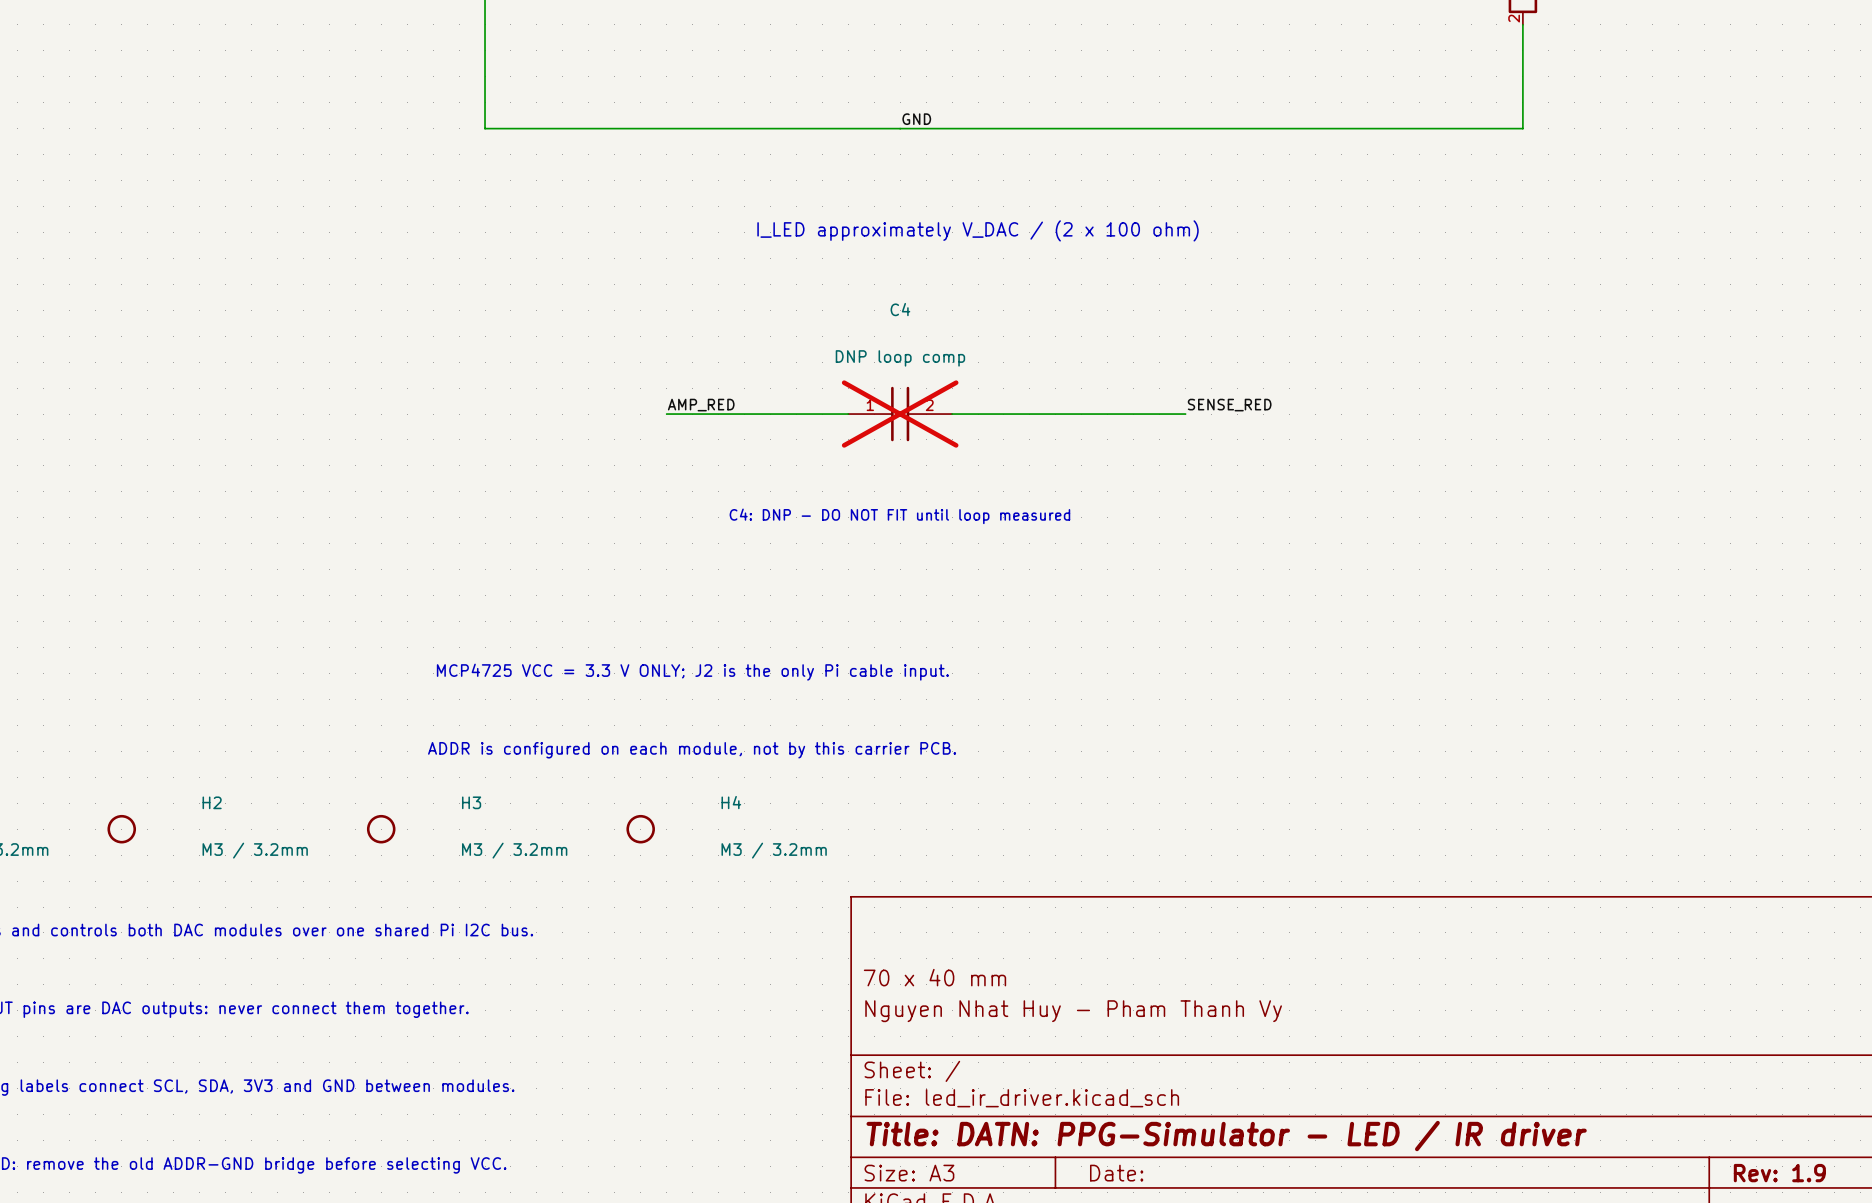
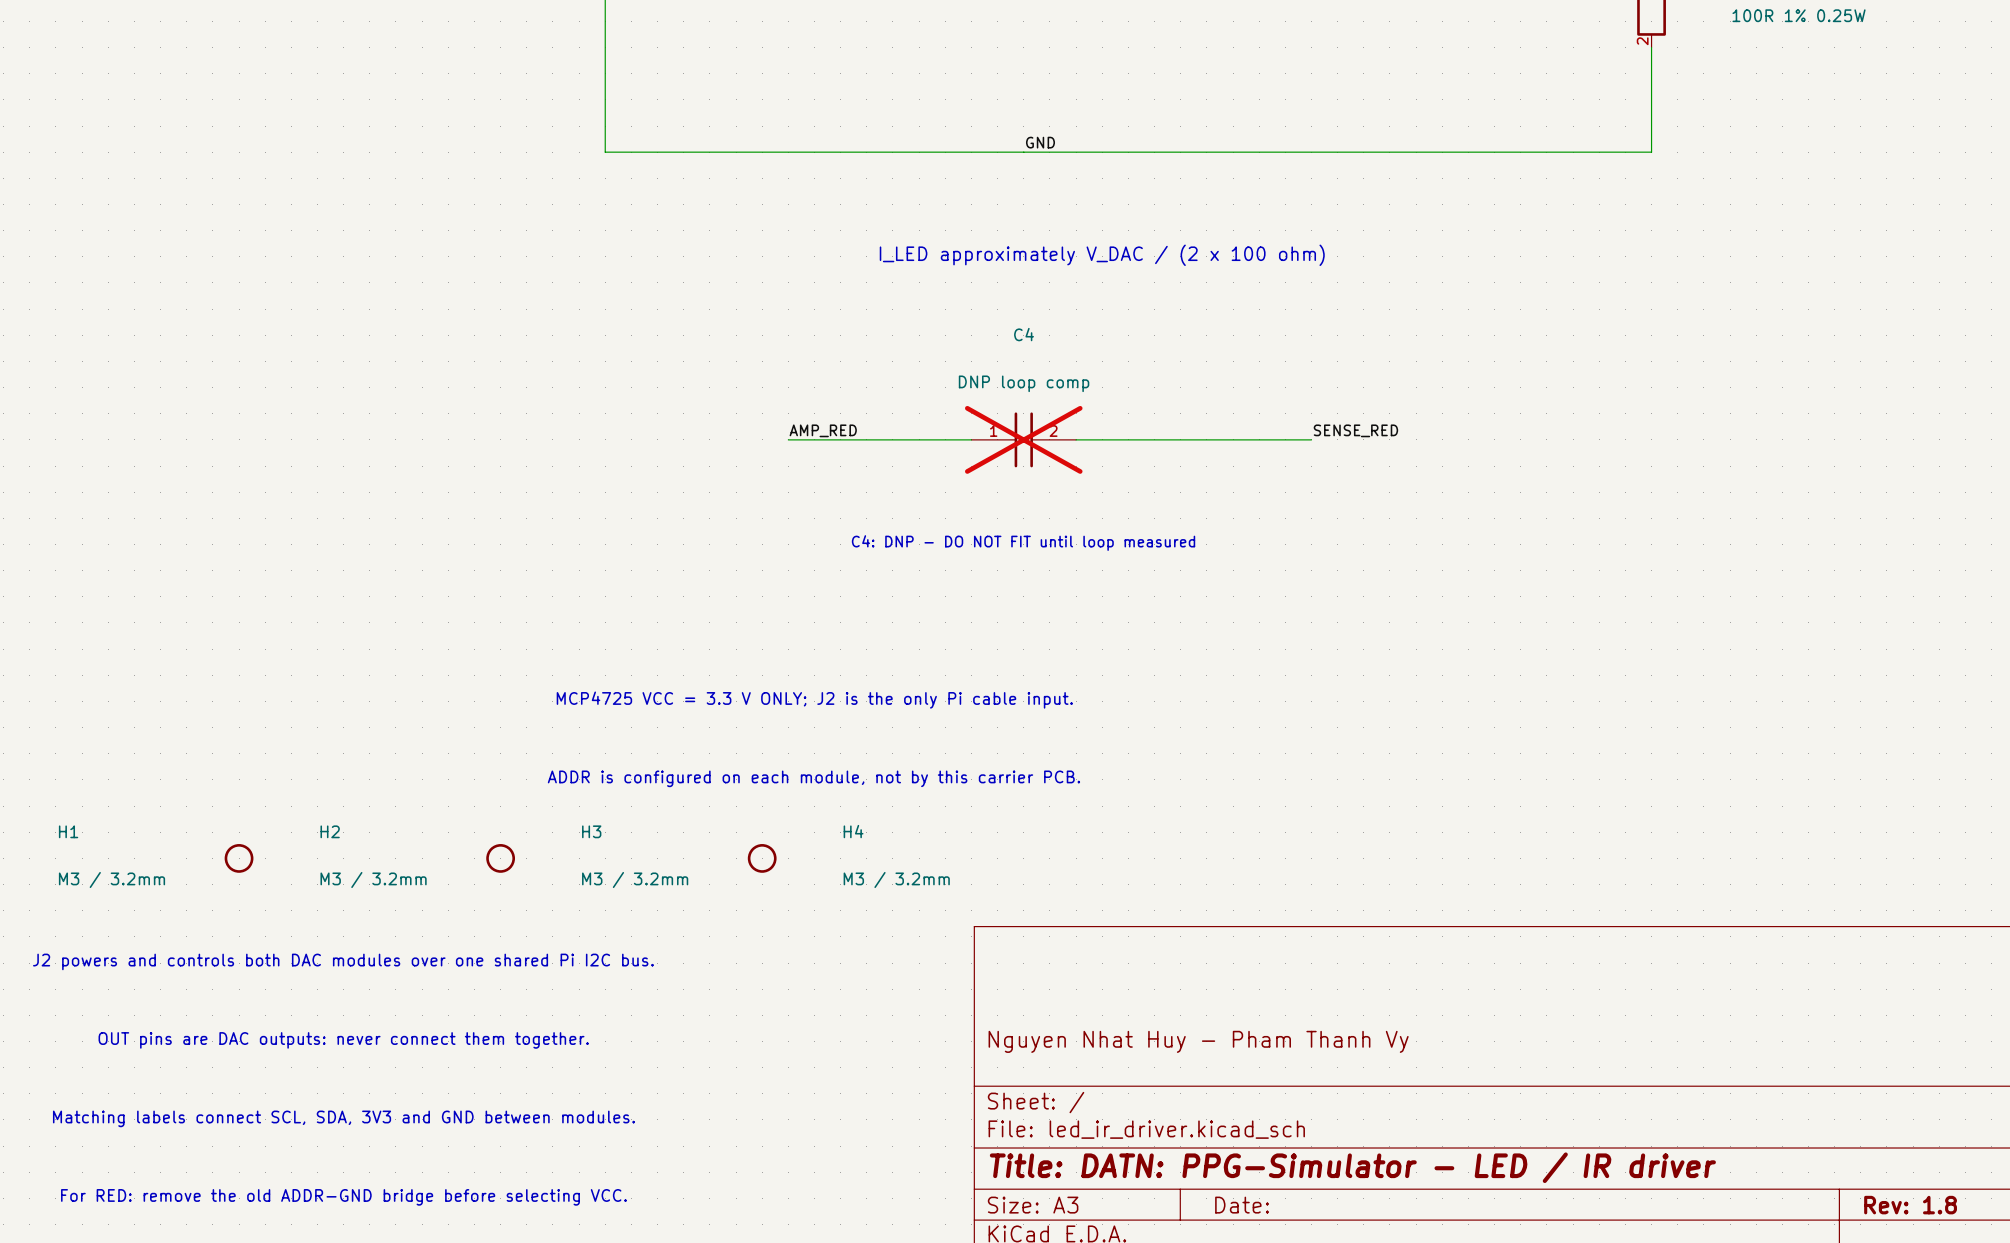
title block: 70 x 40 mm (934, 977) -> none
title block: Rev: 1.9 (1779, 1173) -> Rev: 1.8 (1910, 1205)

